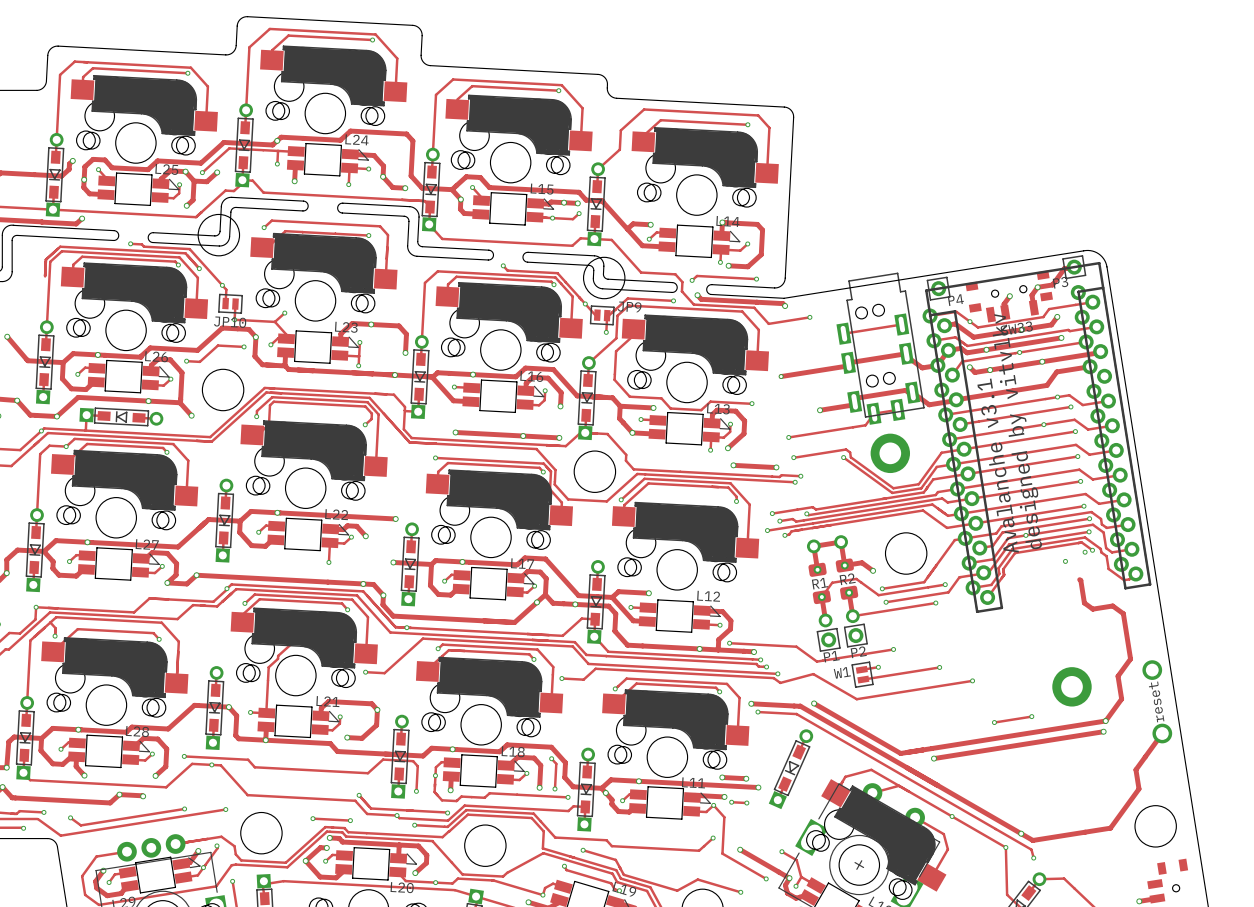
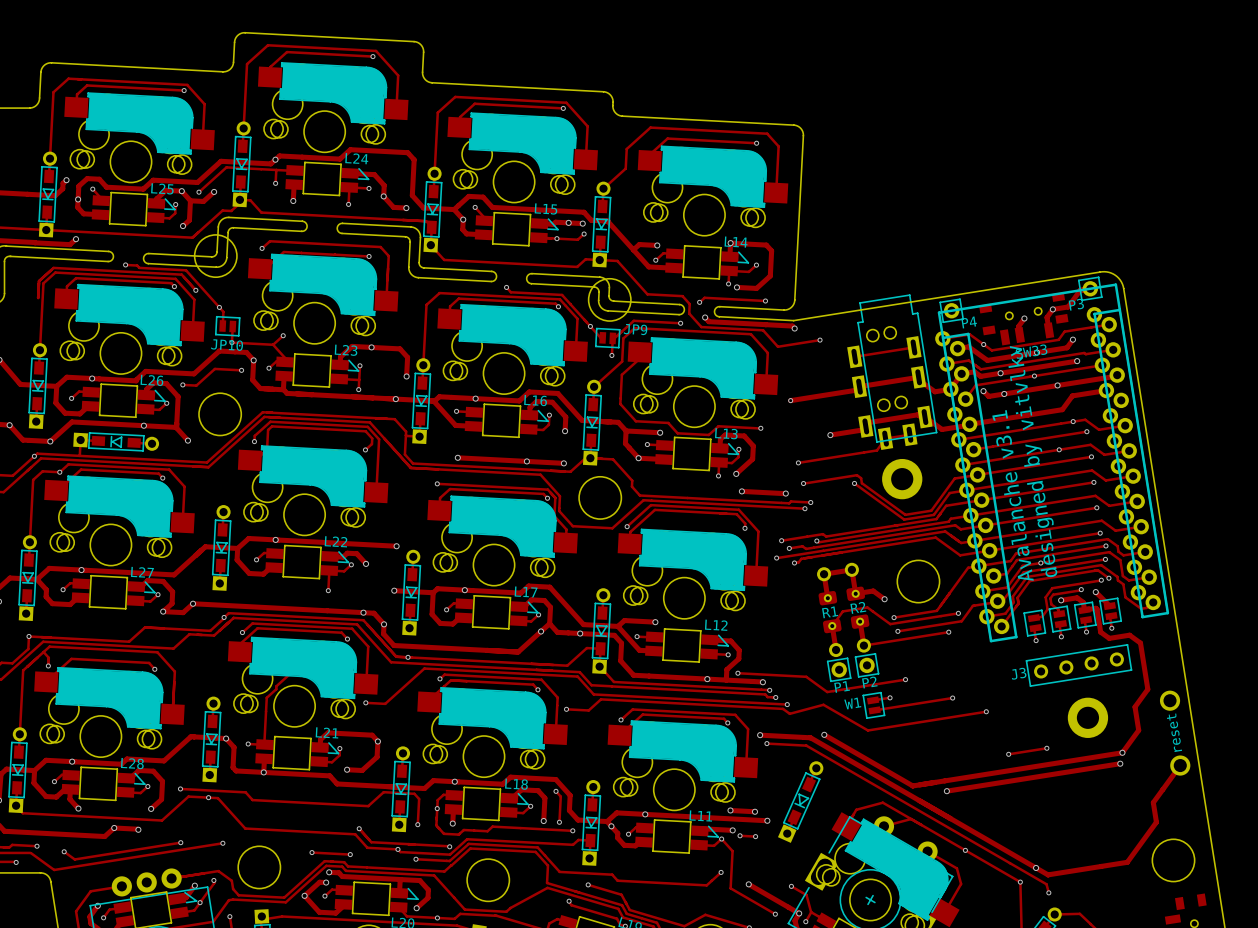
track: none -> (1101, 580) (1052, 588) (1045, 597) (1047, 609) (1042, 616) (1034, 618)
track: none -> (1080, 590) (1053, 594) (1050, 598) (1051, 604) (1058, 609) (1059, 614) (1055, 614)
track: none -> (1095, 592) (1109, 606)
via: none -> (1095, 592)
track: none -> (1061, 600) (1077, 597) (1083, 602) (1084, 610) (1095, 608)
via: none -> (1061, 600)
part: none -> (1110, 611)
part: none -> (1085, 615)
track: none -> (1111, 616) (1110, 617) (1111, 628)
part: none -> (1060, 619)
track: none -> (1084, 621) (1086, 632)
part: none -> (1034, 623)
track: none -> (1061, 624) (1059, 625) (1061, 636)
track: none -> (1035, 628) (1034, 629) (1036, 640)
via: none -> (1111, 628)
via: none -> (1086, 632)
via: none -> (1061, 636)
via: none -> (1036, 640)
J3: none -> (1078, 665)

